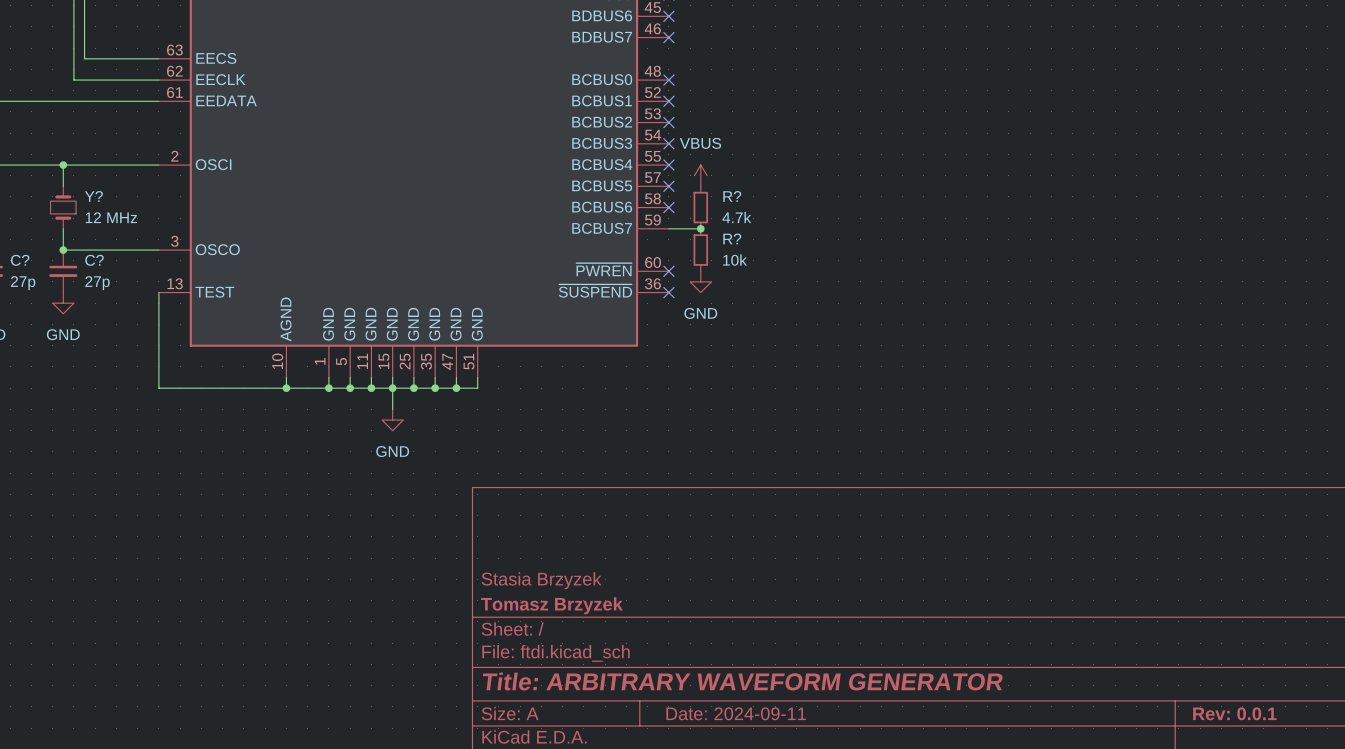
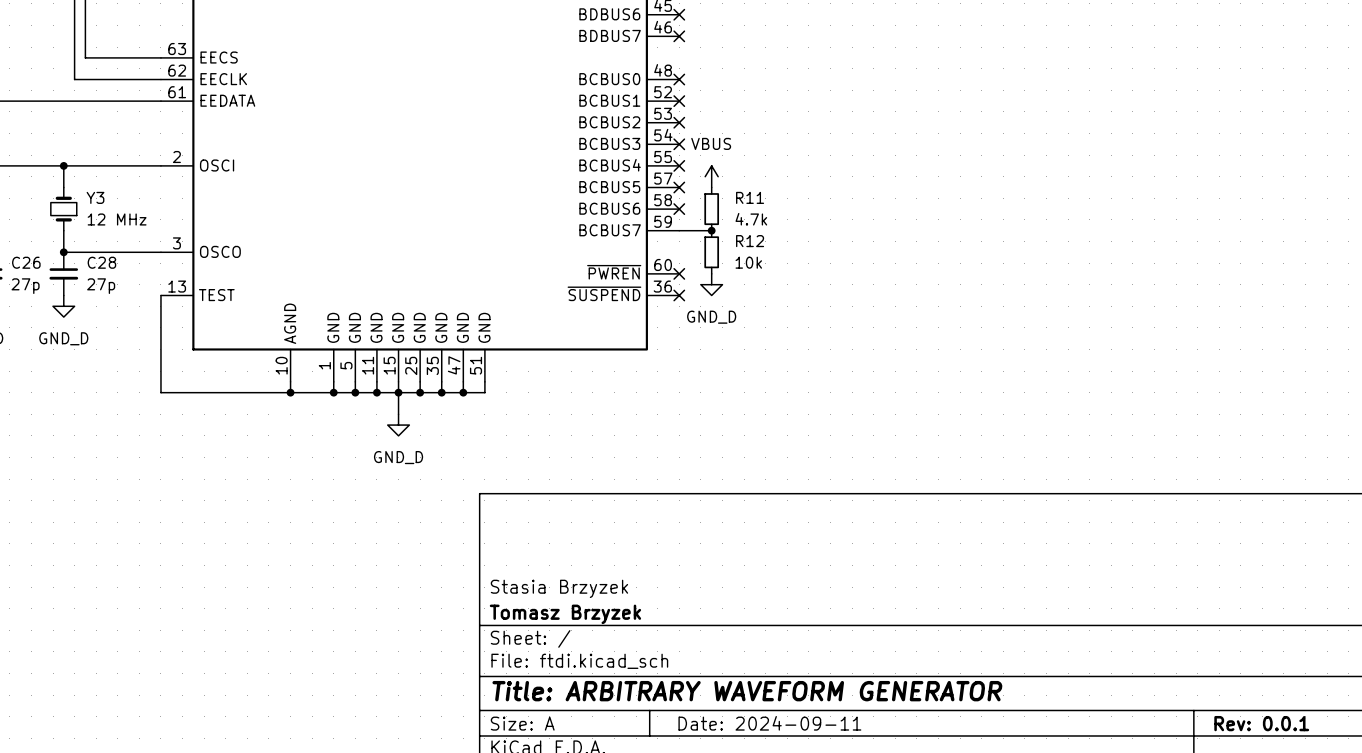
Y? name: Y? (93, 196) -> Y3 (95, 197)
R? name: R? (732, 196) -> R11 (750, 197)
R? name: R? (732, 238) -> R12 (750, 241)
C? name: C? (20, 260) -> C26 (26, 262)
C? name: C? (94, 260) -> C28 (101, 262)
power symbol: GND (700, 281) -> GND_D (711, 284)
power symbol: GND (63, 303) -> GND_D (63, 306)
power symbol: GND (392, 420) -> GND_D (398, 425)

